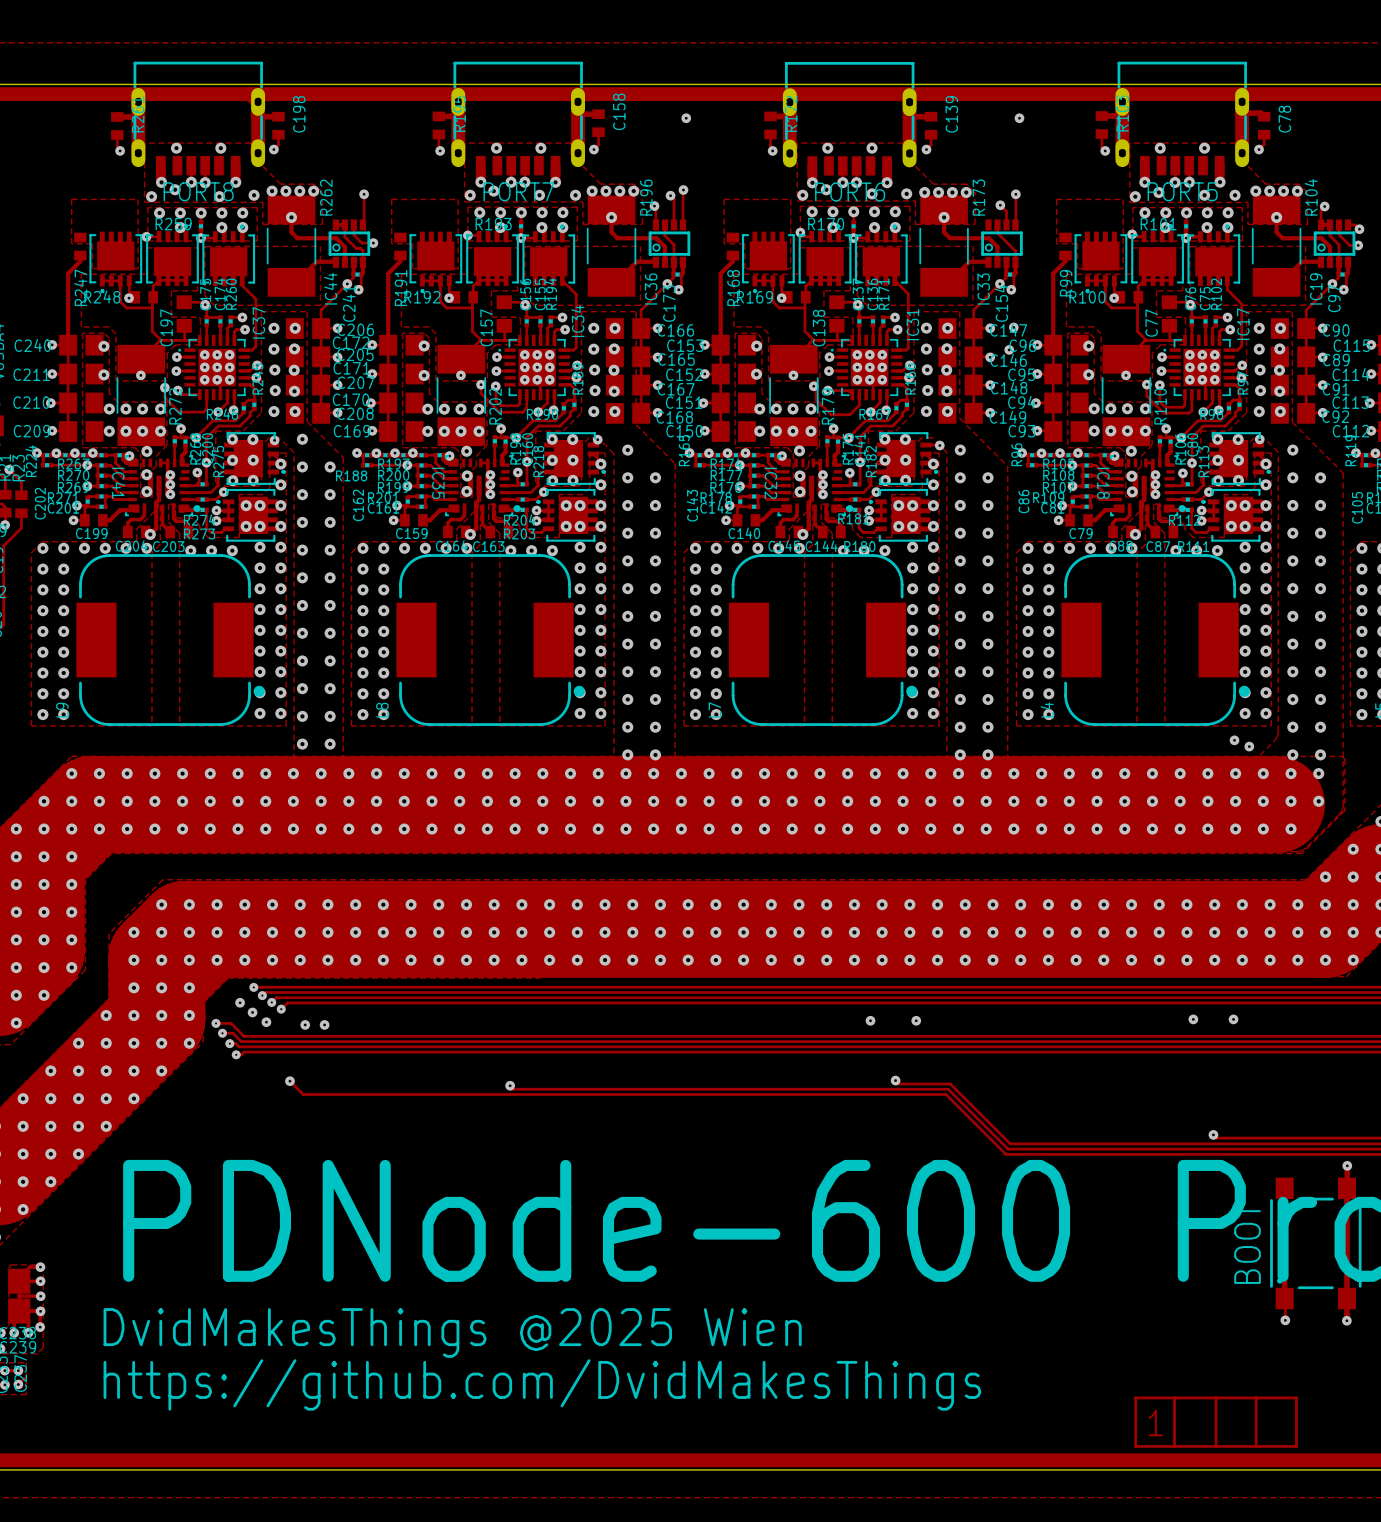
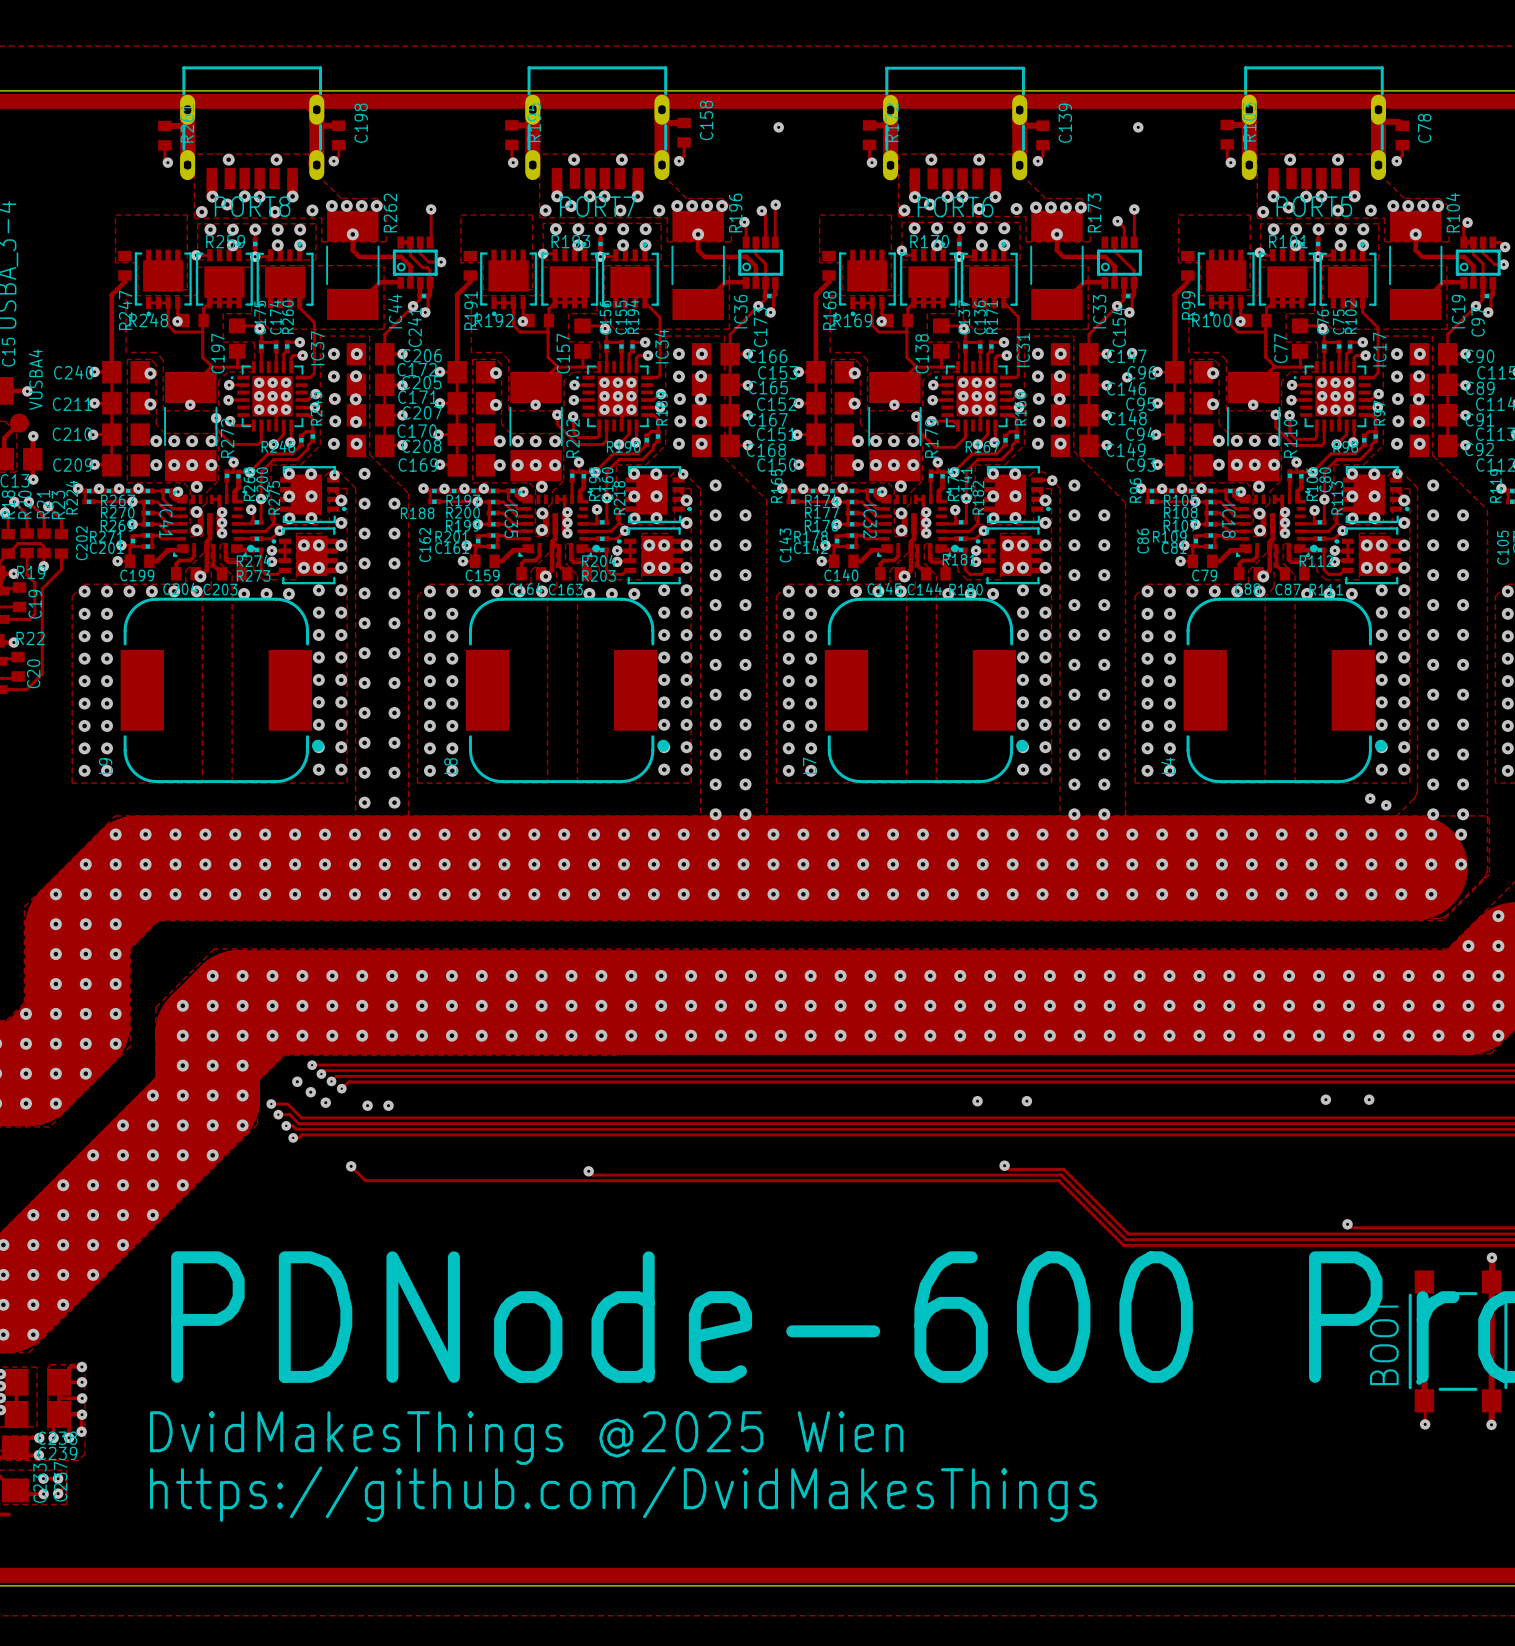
track: (1135, 1397) (1296, 1397) (1296, 1446) (1135, 1446) (1135, 1397) -> none
track: (1174, 1397) (1174, 1446) -> none
track: (1216, 1397) (1216, 1446) -> none
track: (1256, 1397) (1256, 1446) -> none
text: 1 (1155, 1423) -> none

